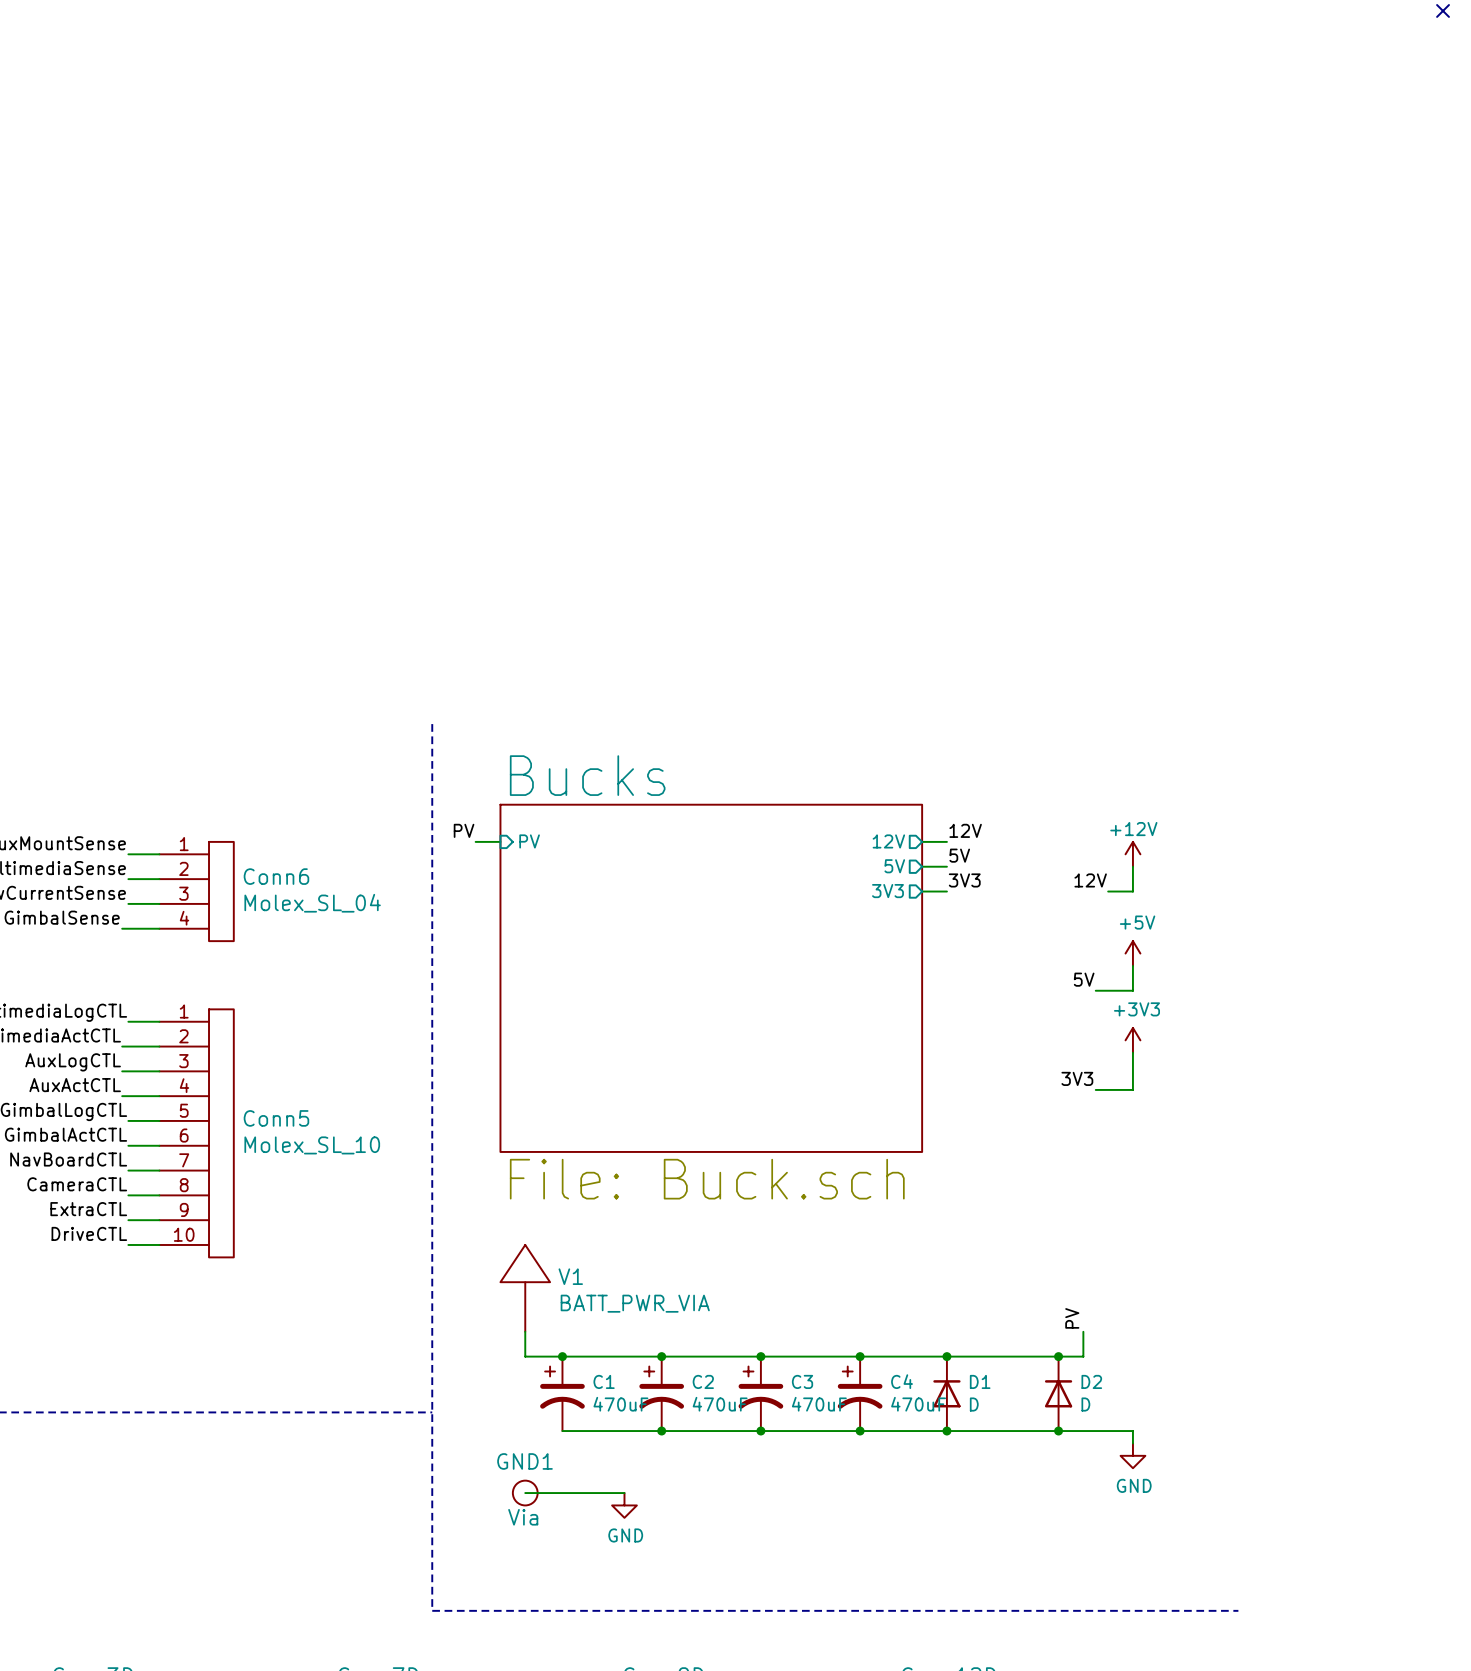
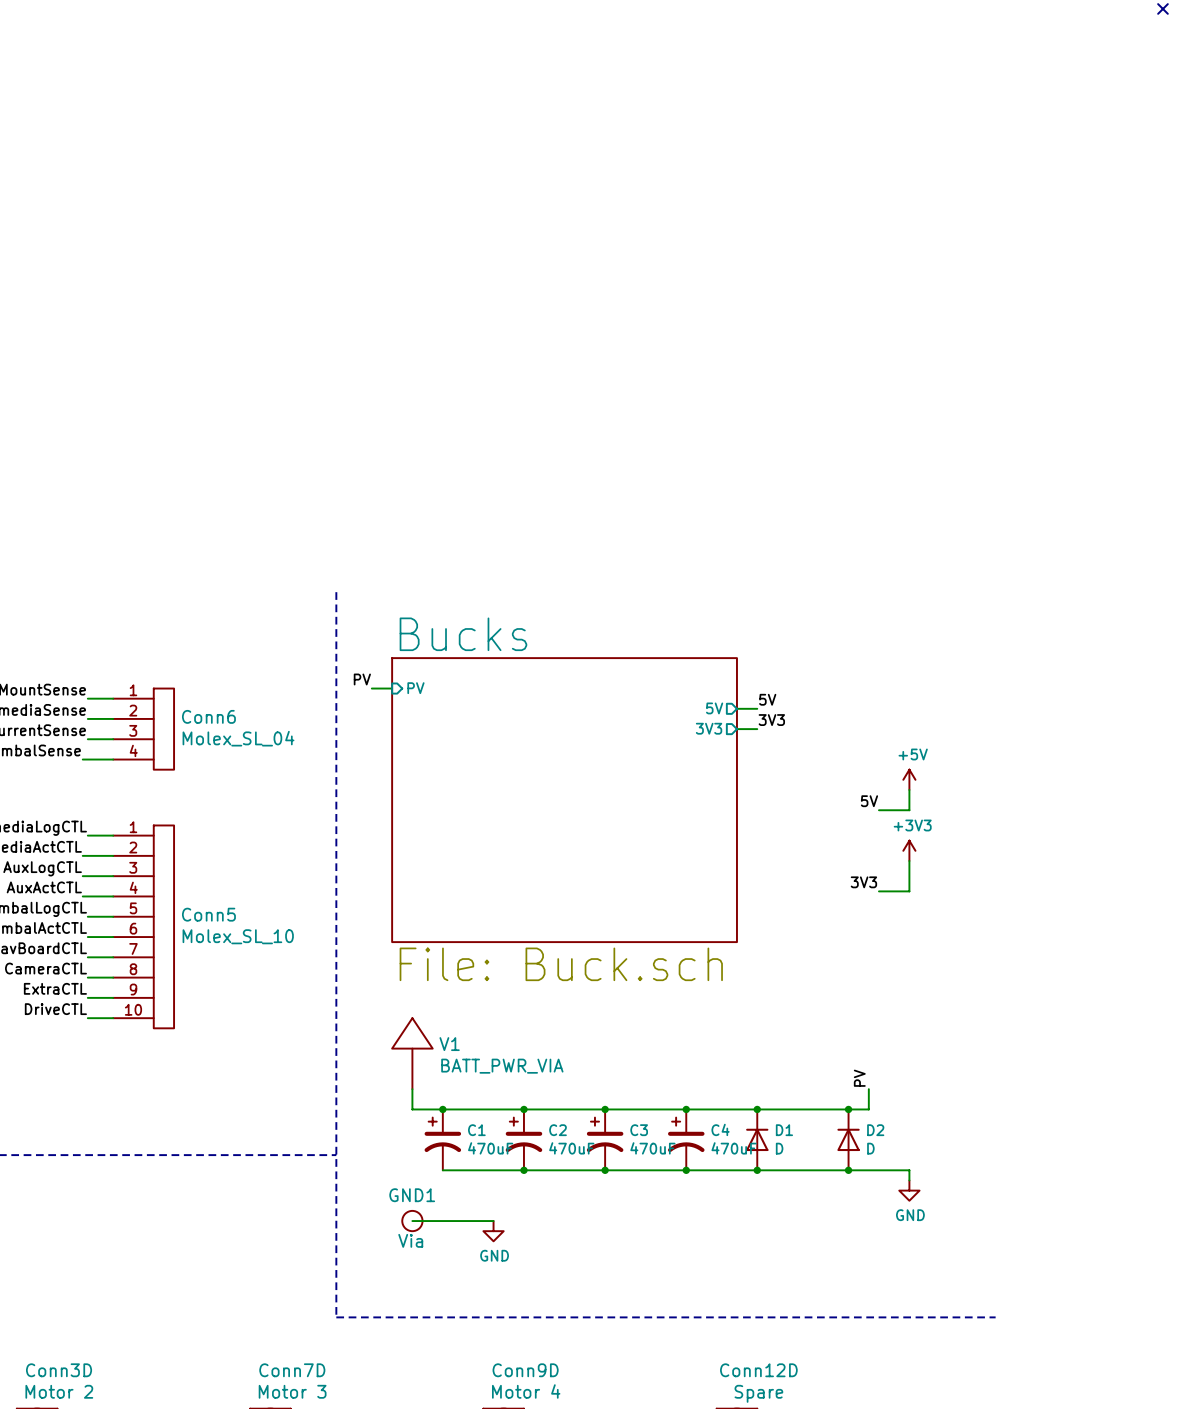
label: 12V (965, 830) -> none
sheet pin: 12V (888, 841) -> none
wire: (922, 841) (946, 841) -> none
power symbol: +12V (1132, 854) -> none
wire: (1132, 866) (1132, 891) (1108, 891) -> none
label: 12V (1090, 880) -> none

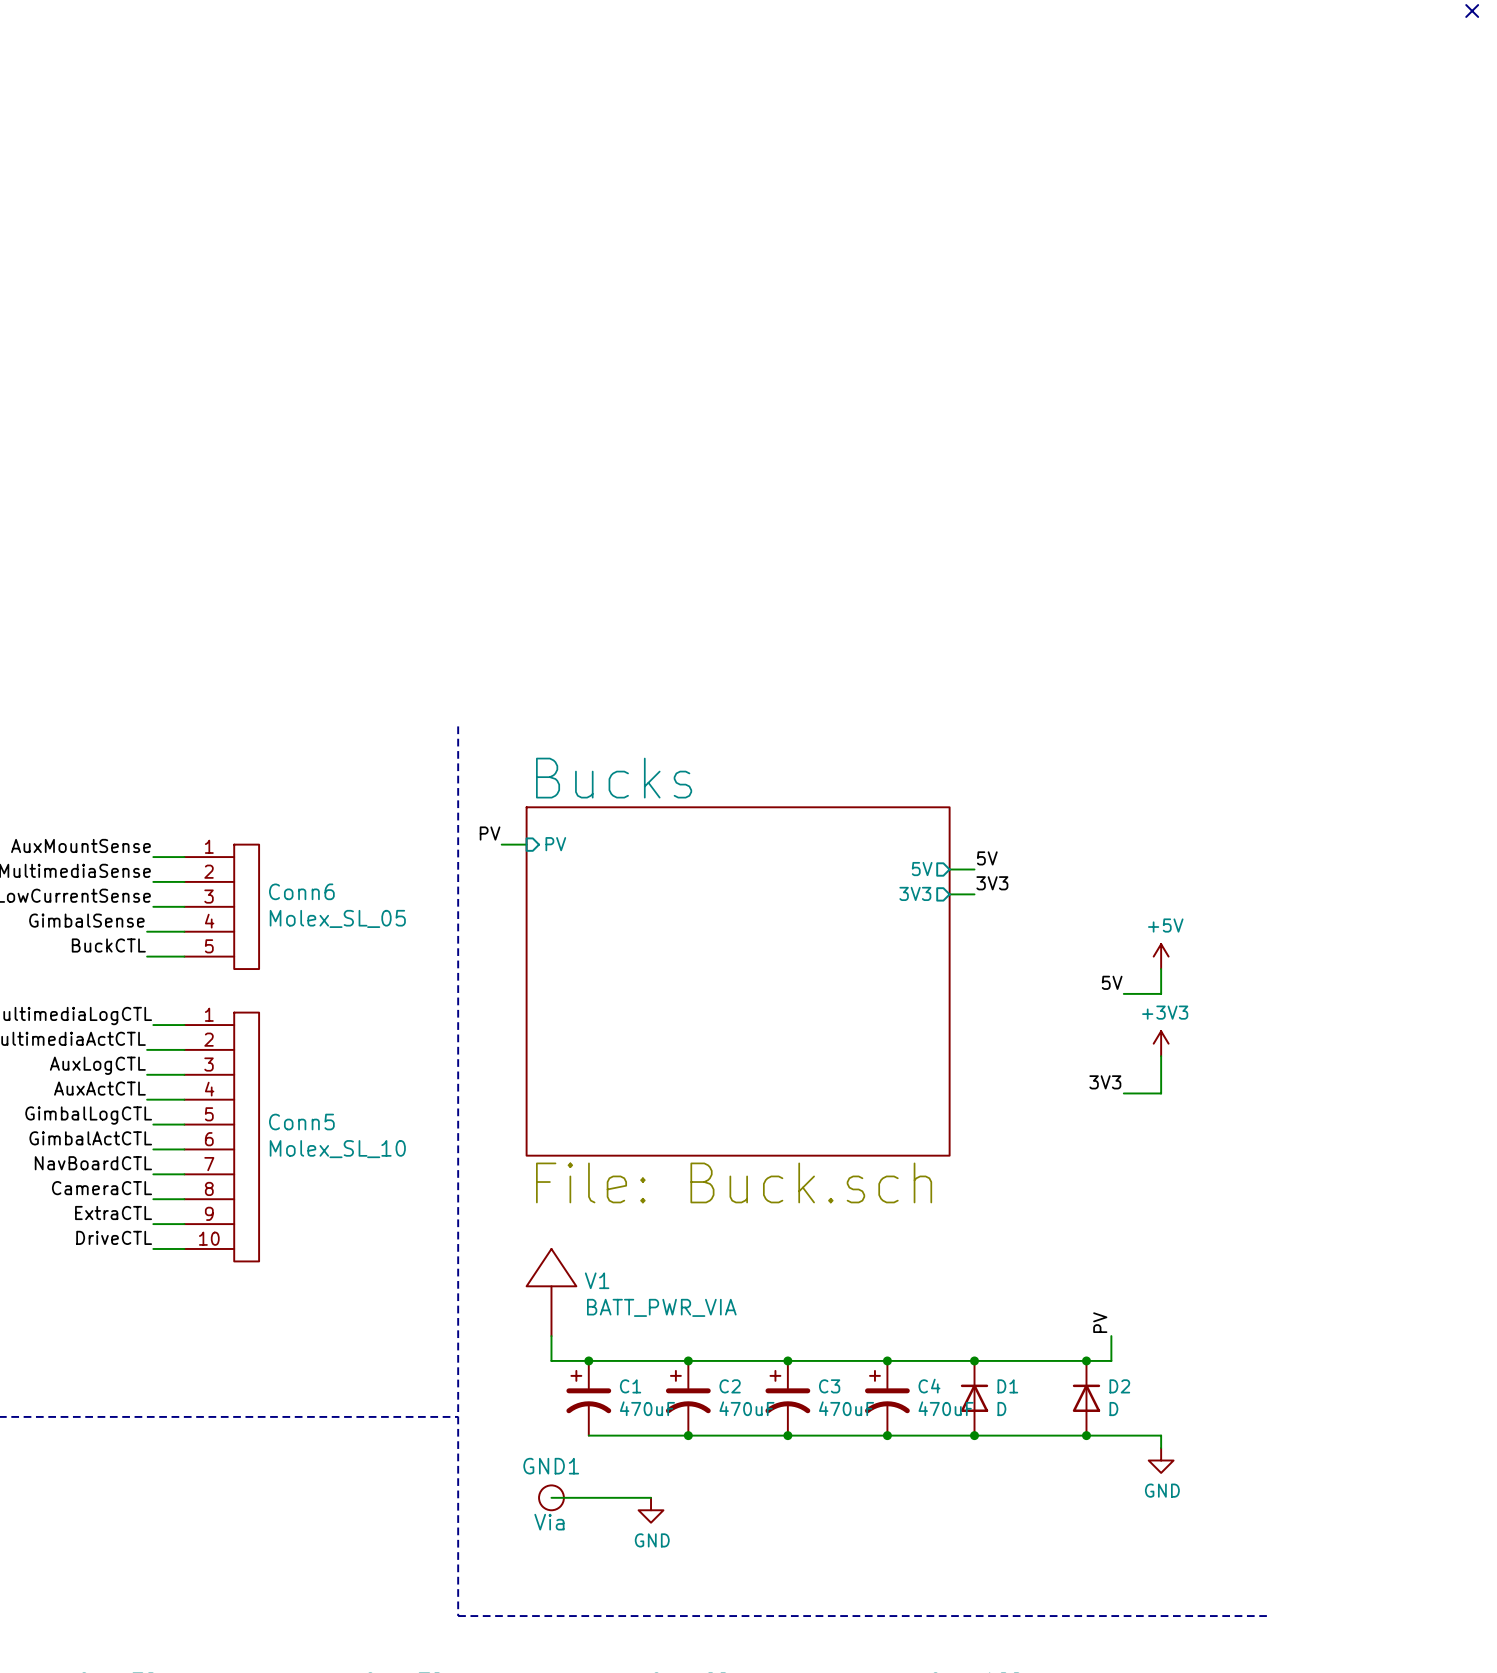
Conn6 symbol: [113, 688, 175, 770] -> [184, 844, 260, 970]
Conn6 value: Molex_SL_04 (238, 738) -> Molex_SL_05 (337, 918)
label: none -> BuckCTL (108, 945)
wire: none -> (147, 956) (184, 956)

